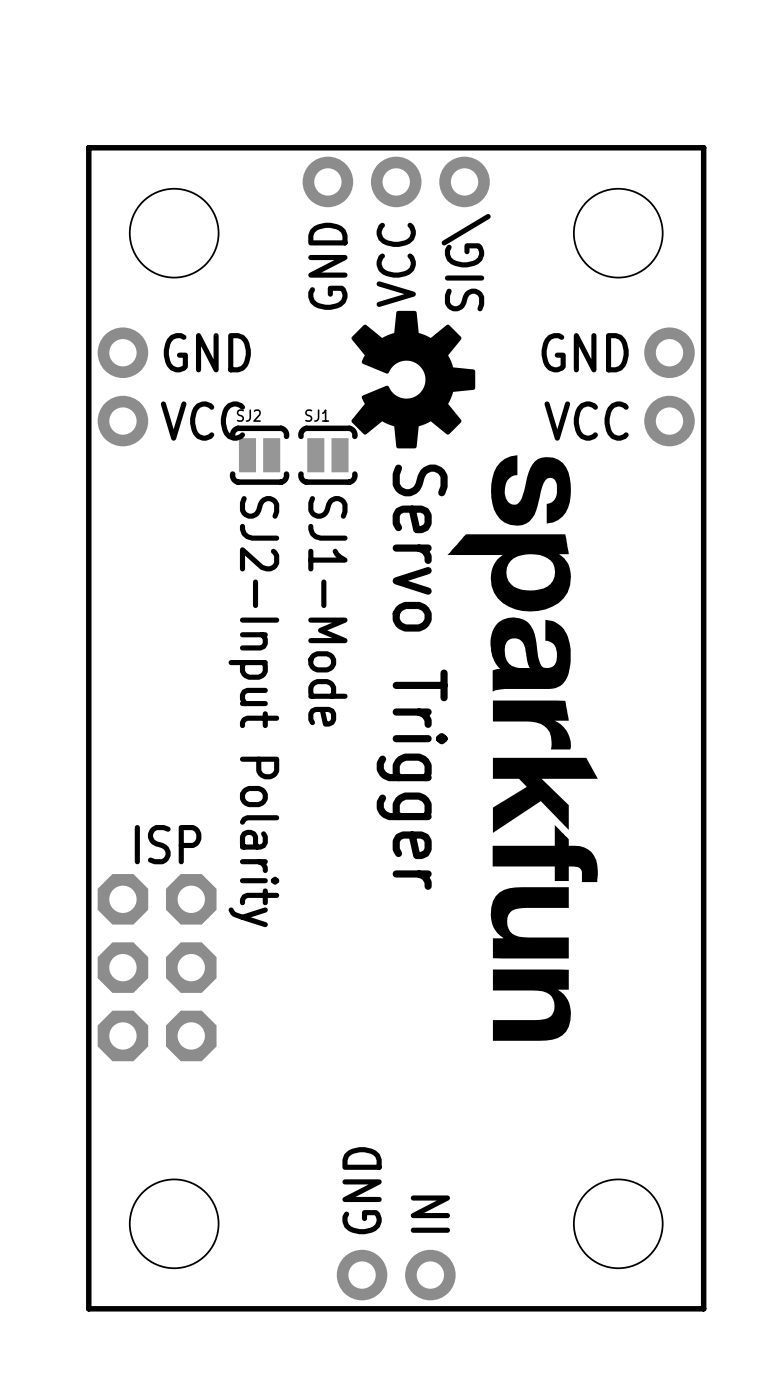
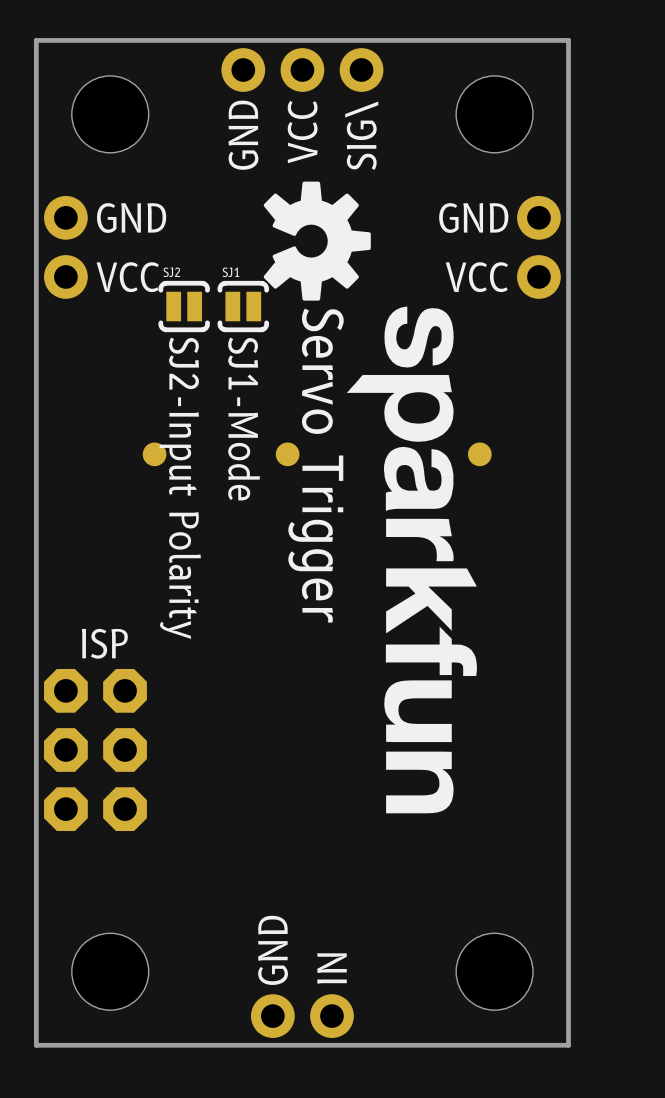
part: none -> (154, 454)
part: none -> (287, 454)
part: none -> (479, 454)

